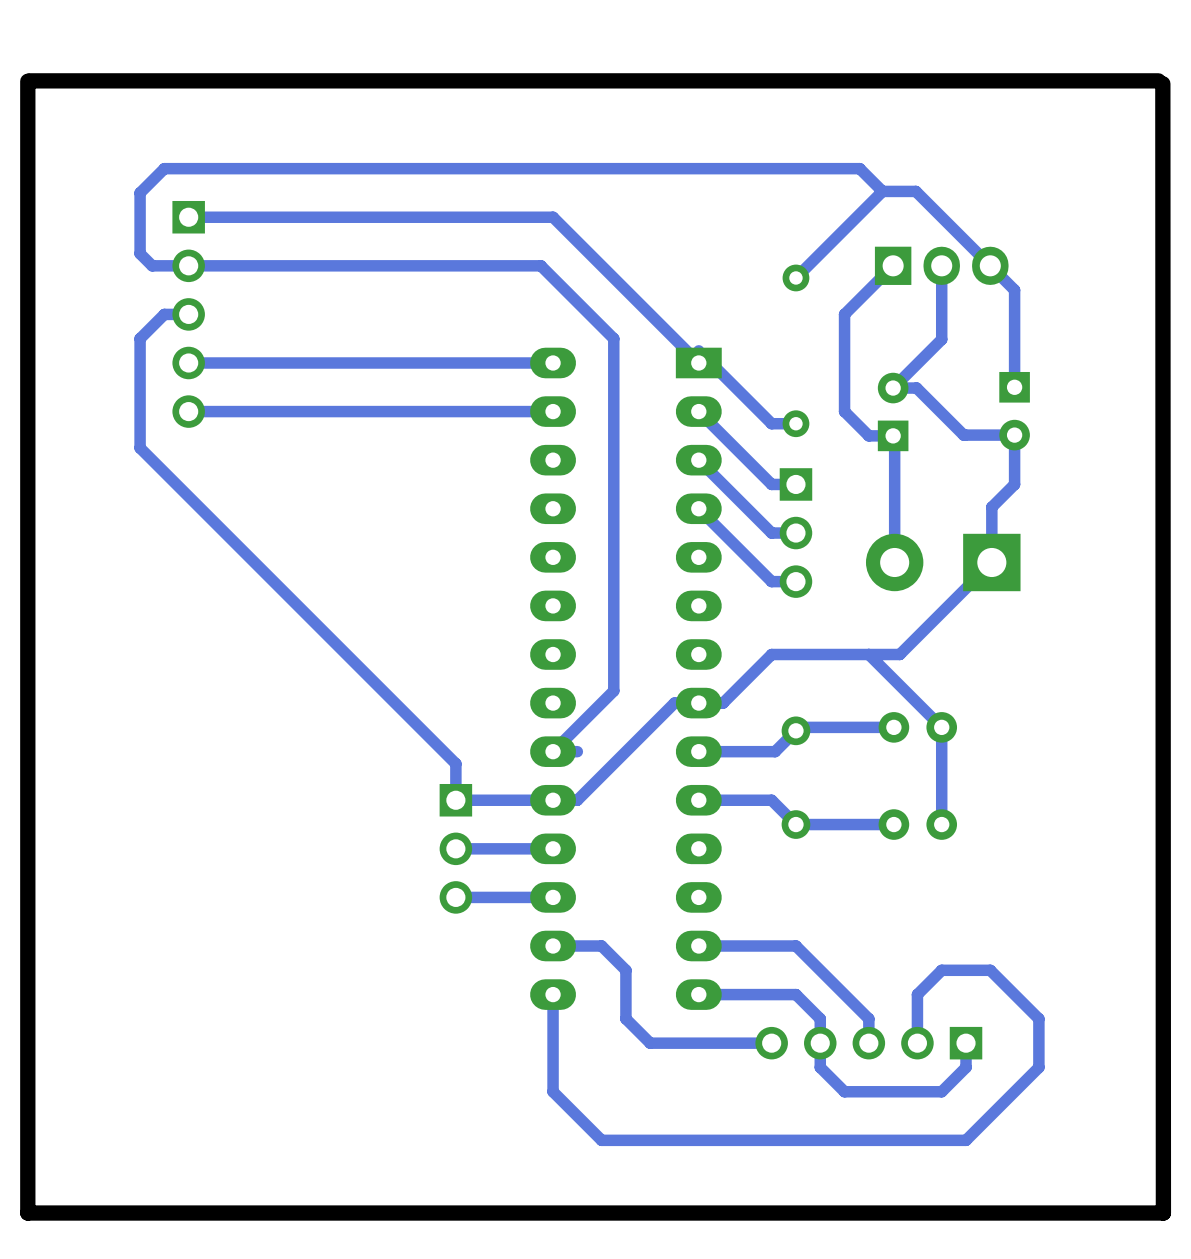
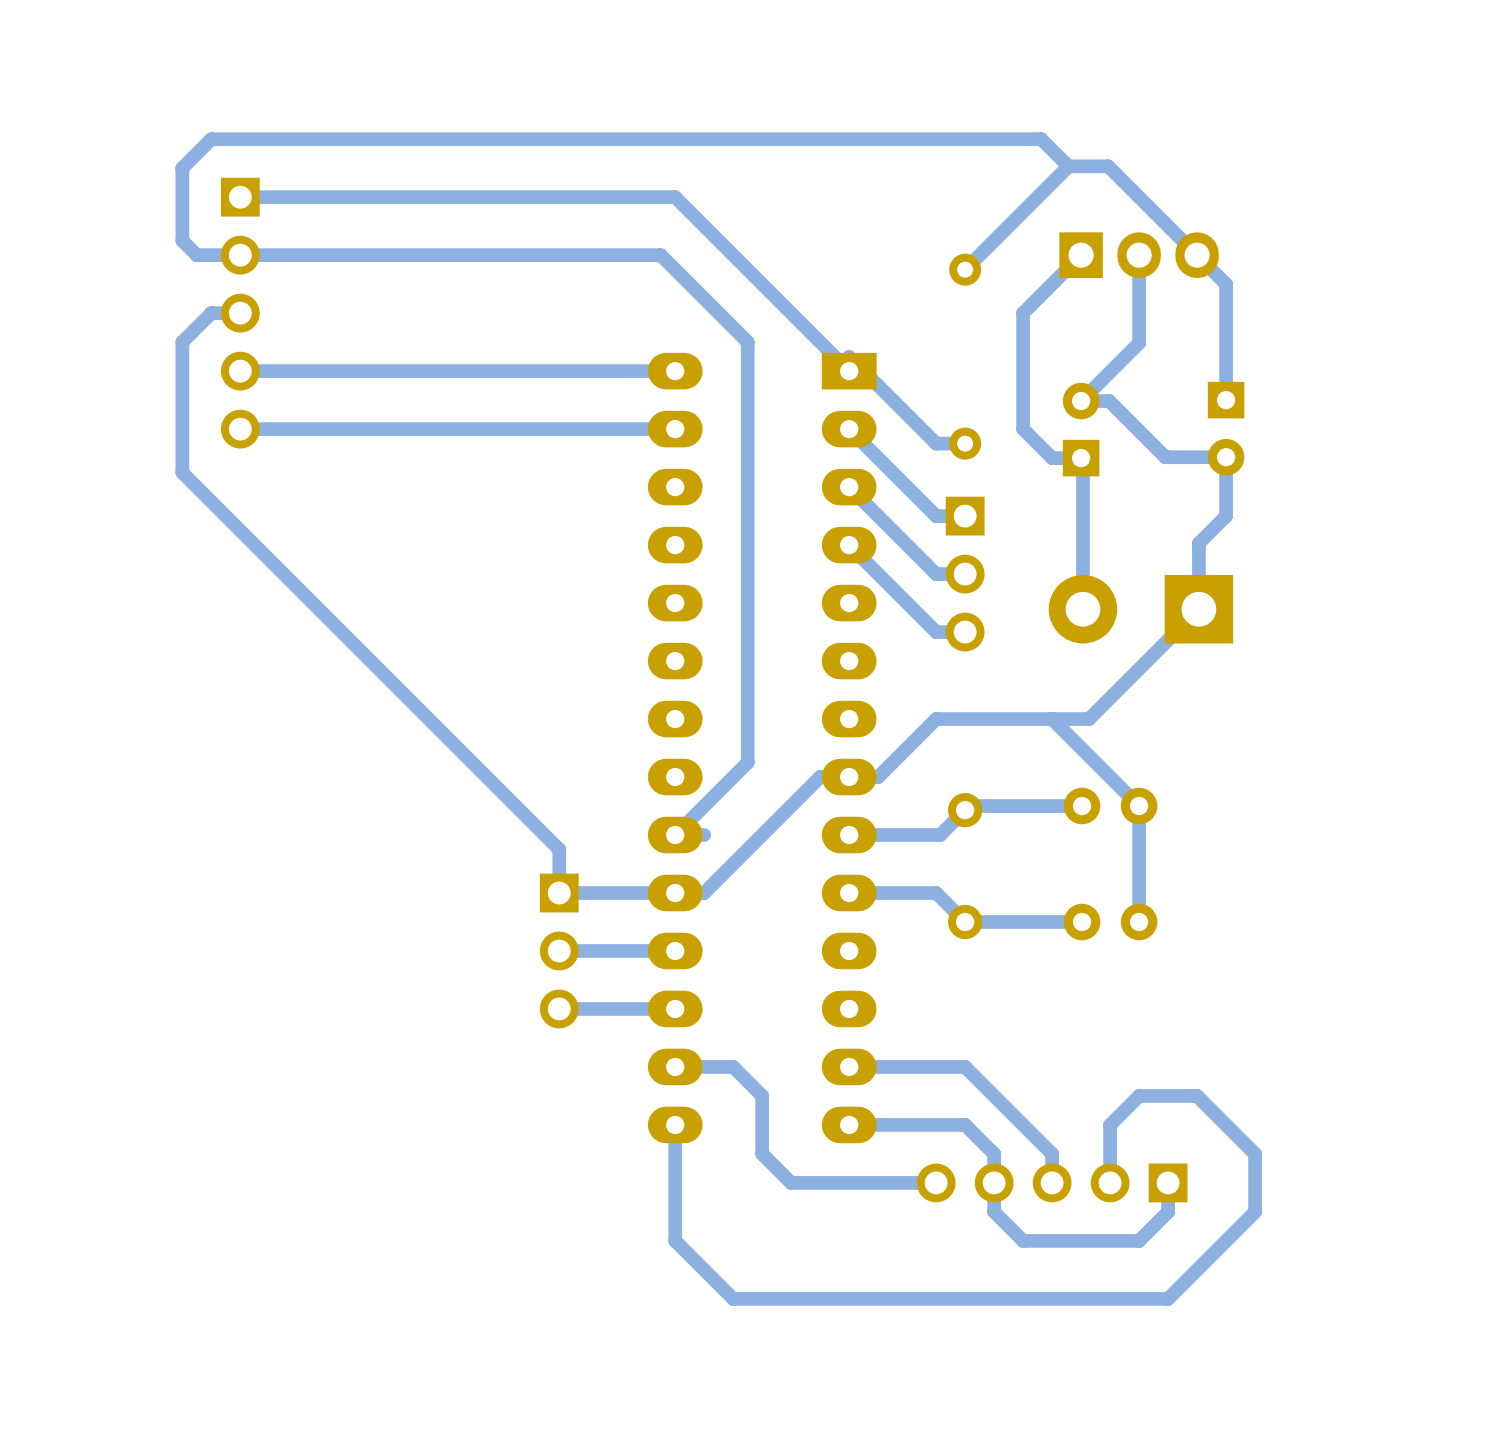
board edge: (1158, 80) (29, 80) -> none
board edge: (27, 81) (27, 1213) (1163, 1213) (1162, 83) -> none

